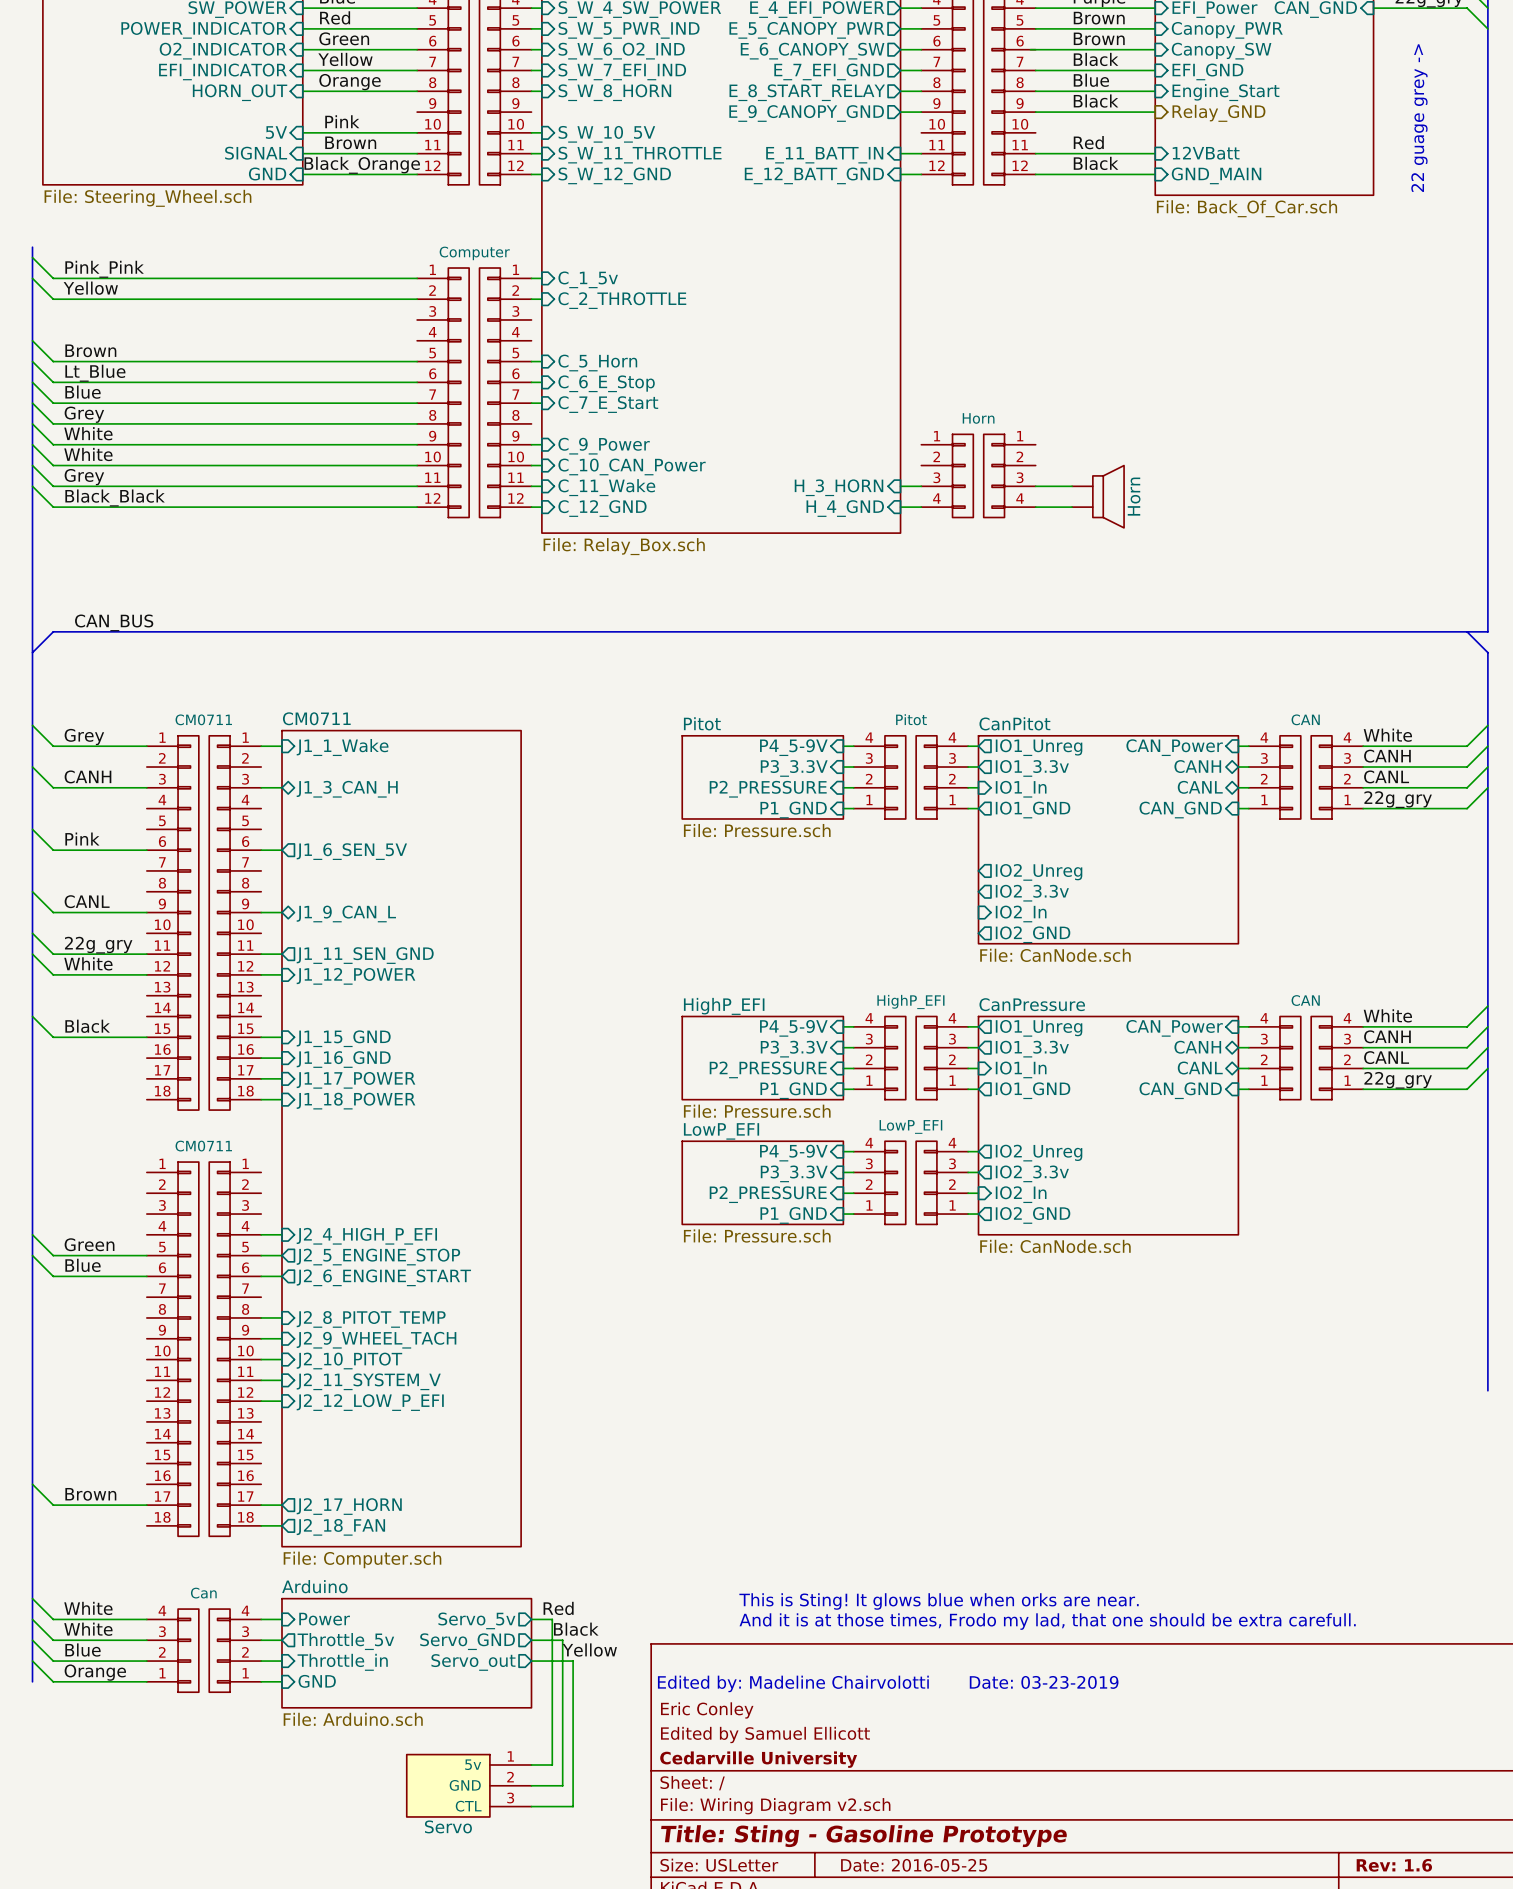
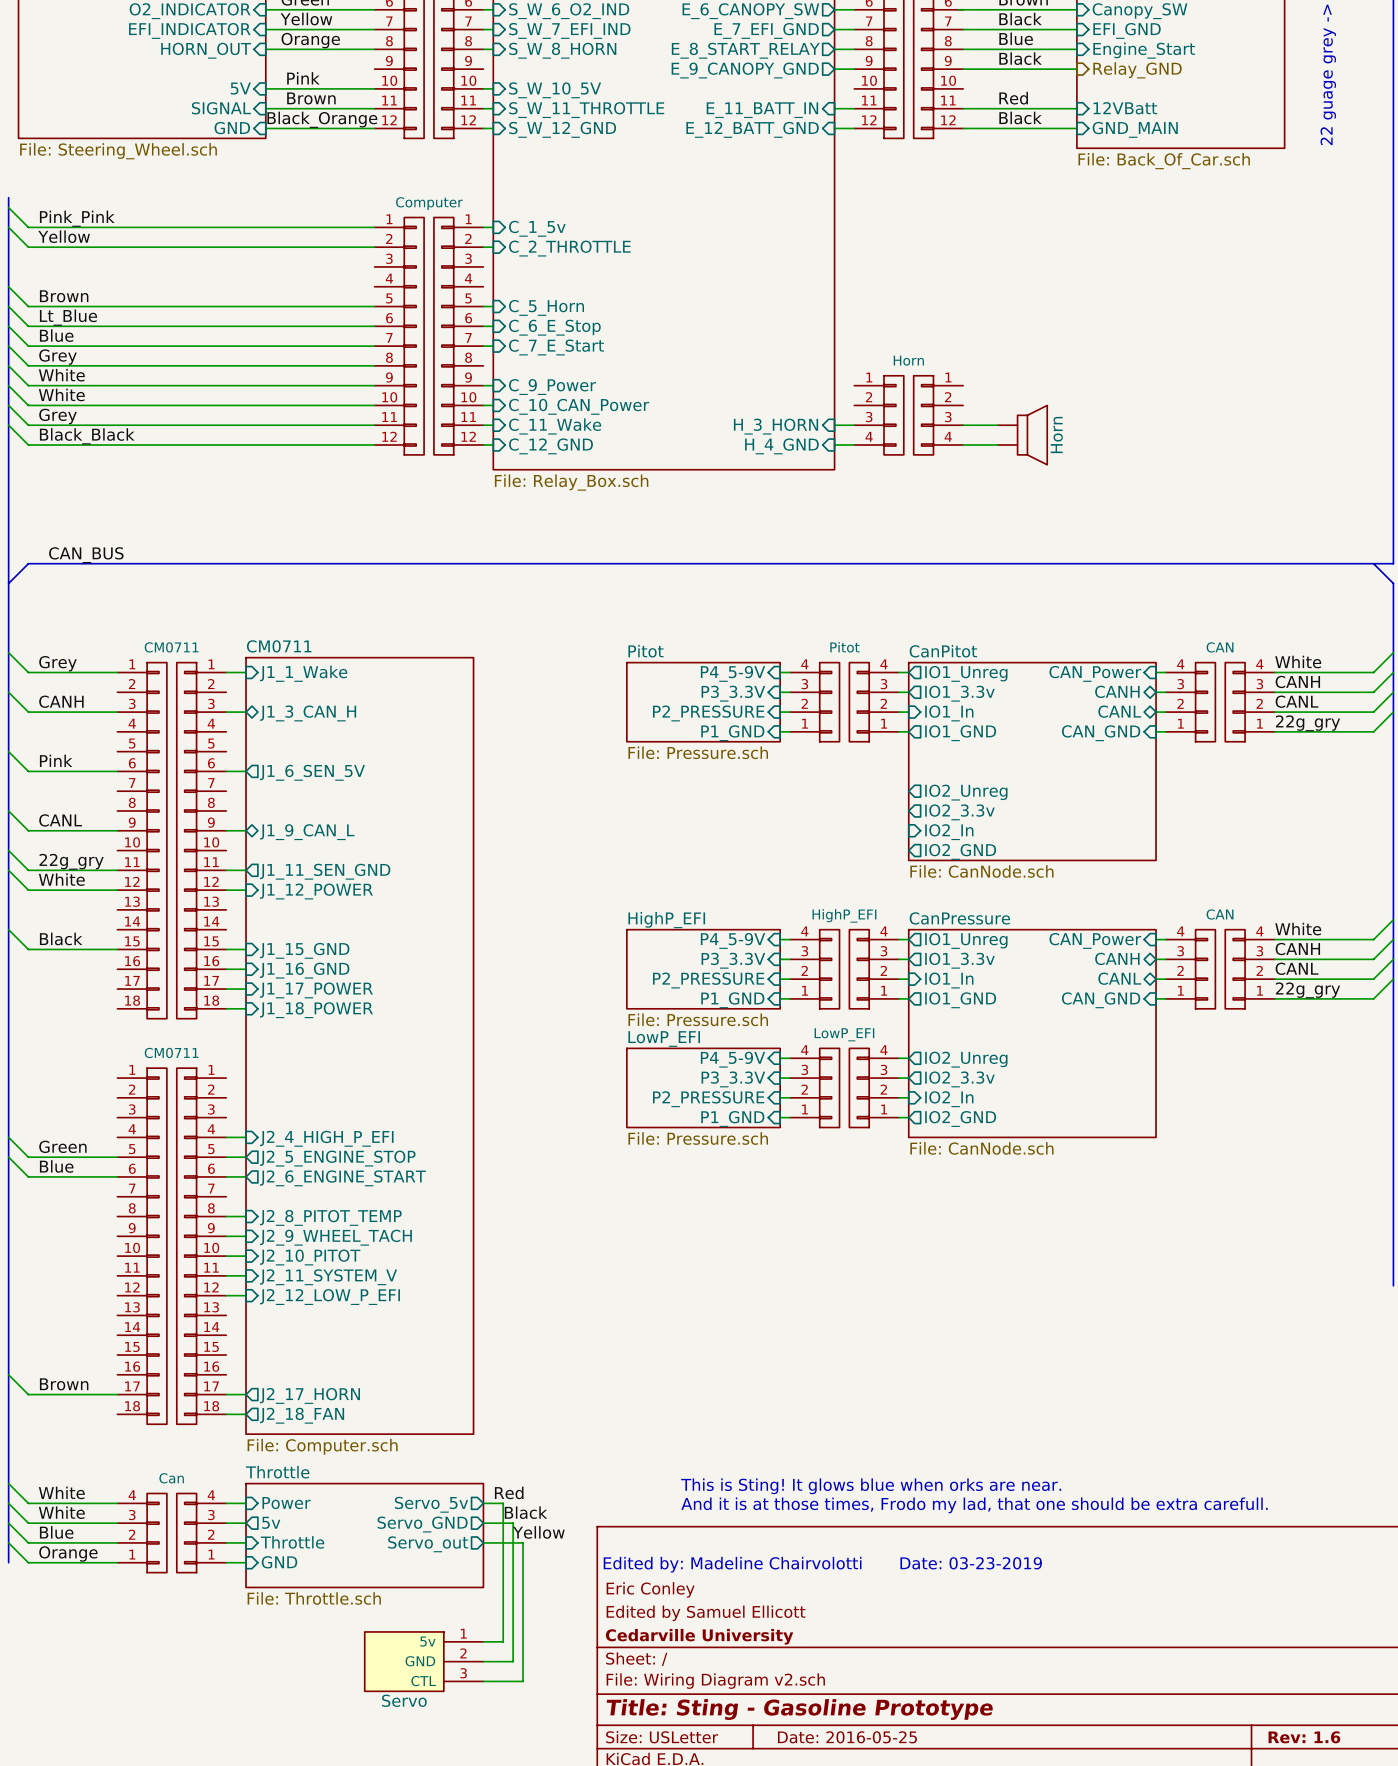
sheet Arduino name: Arduino (314, 1586) -> Throttle (277, 1472)
sheet pin: Throttle_5v (345, 1641) -> 5v (271, 1522)
sheet pin: Throttle_in (342, 1662) -> Throttle (292, 1542)
sheet Arduino value: File: Arduino.sch (353, 1719) -> File: Throttle.sch (314, 1598)

